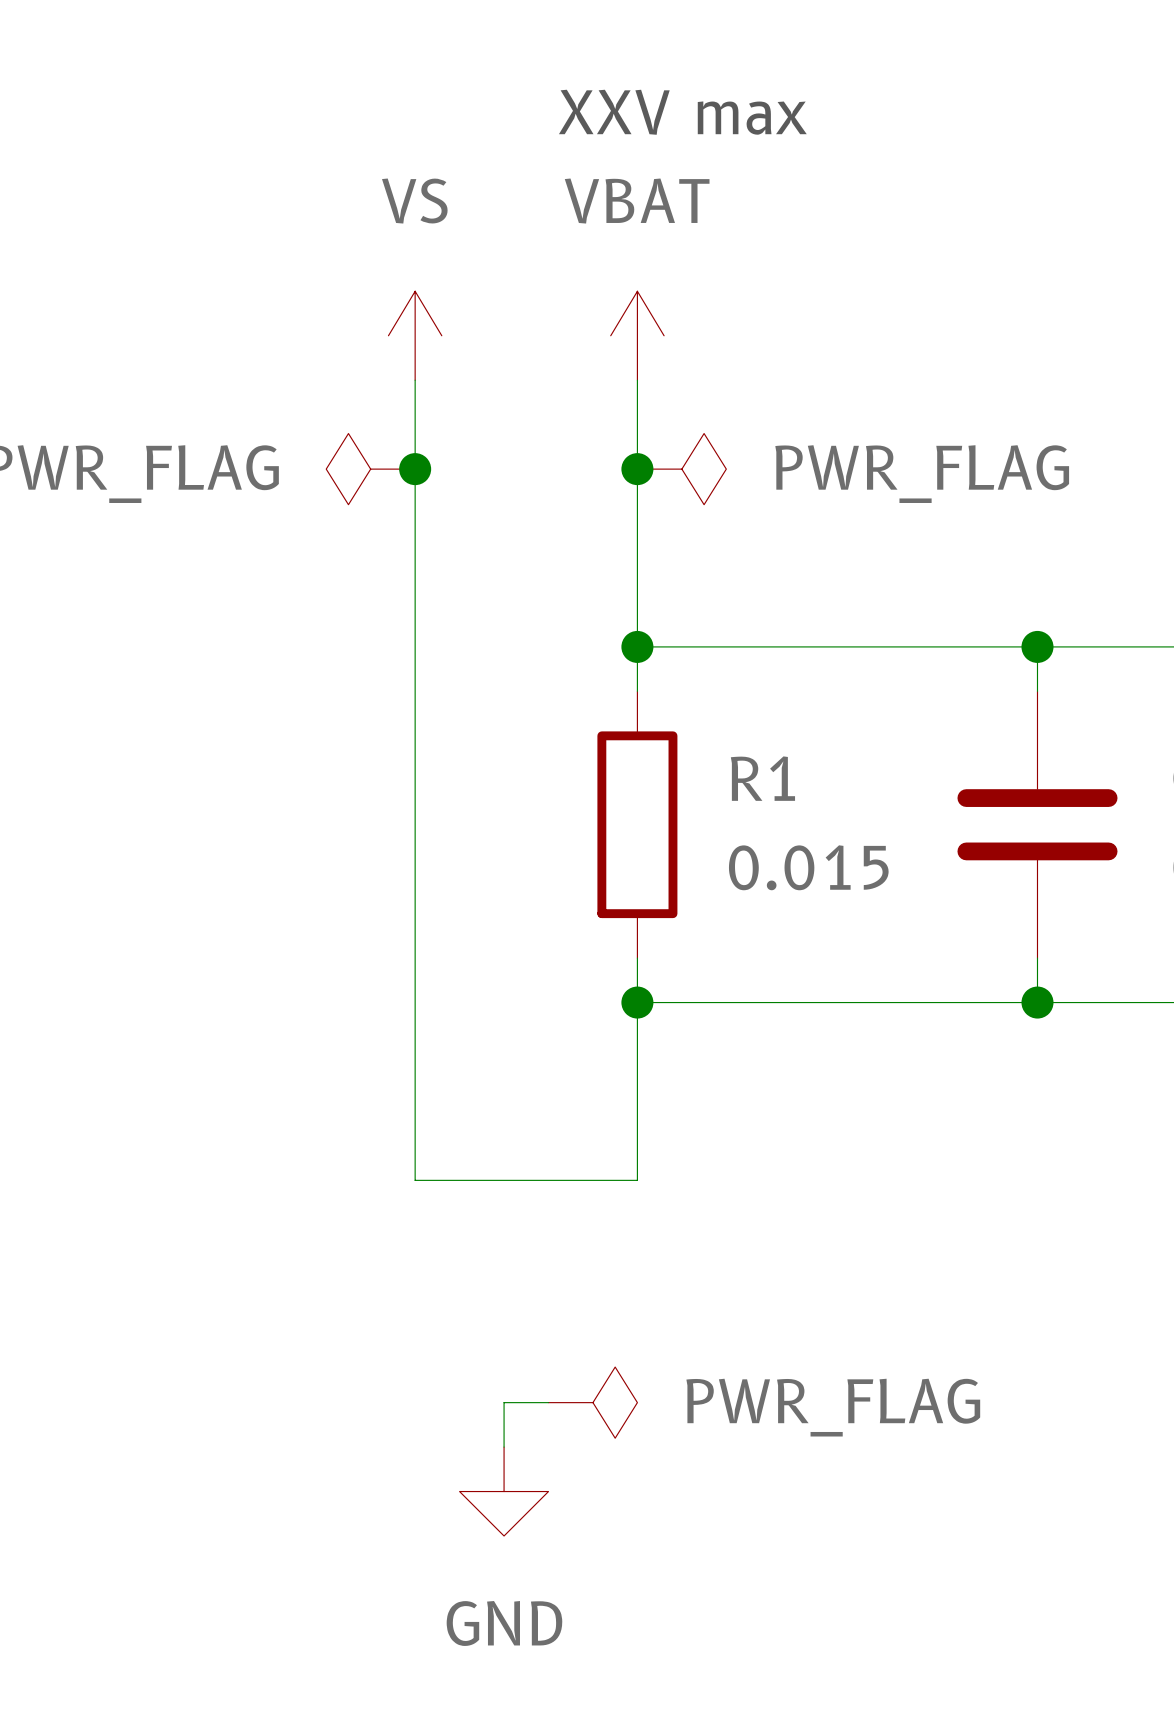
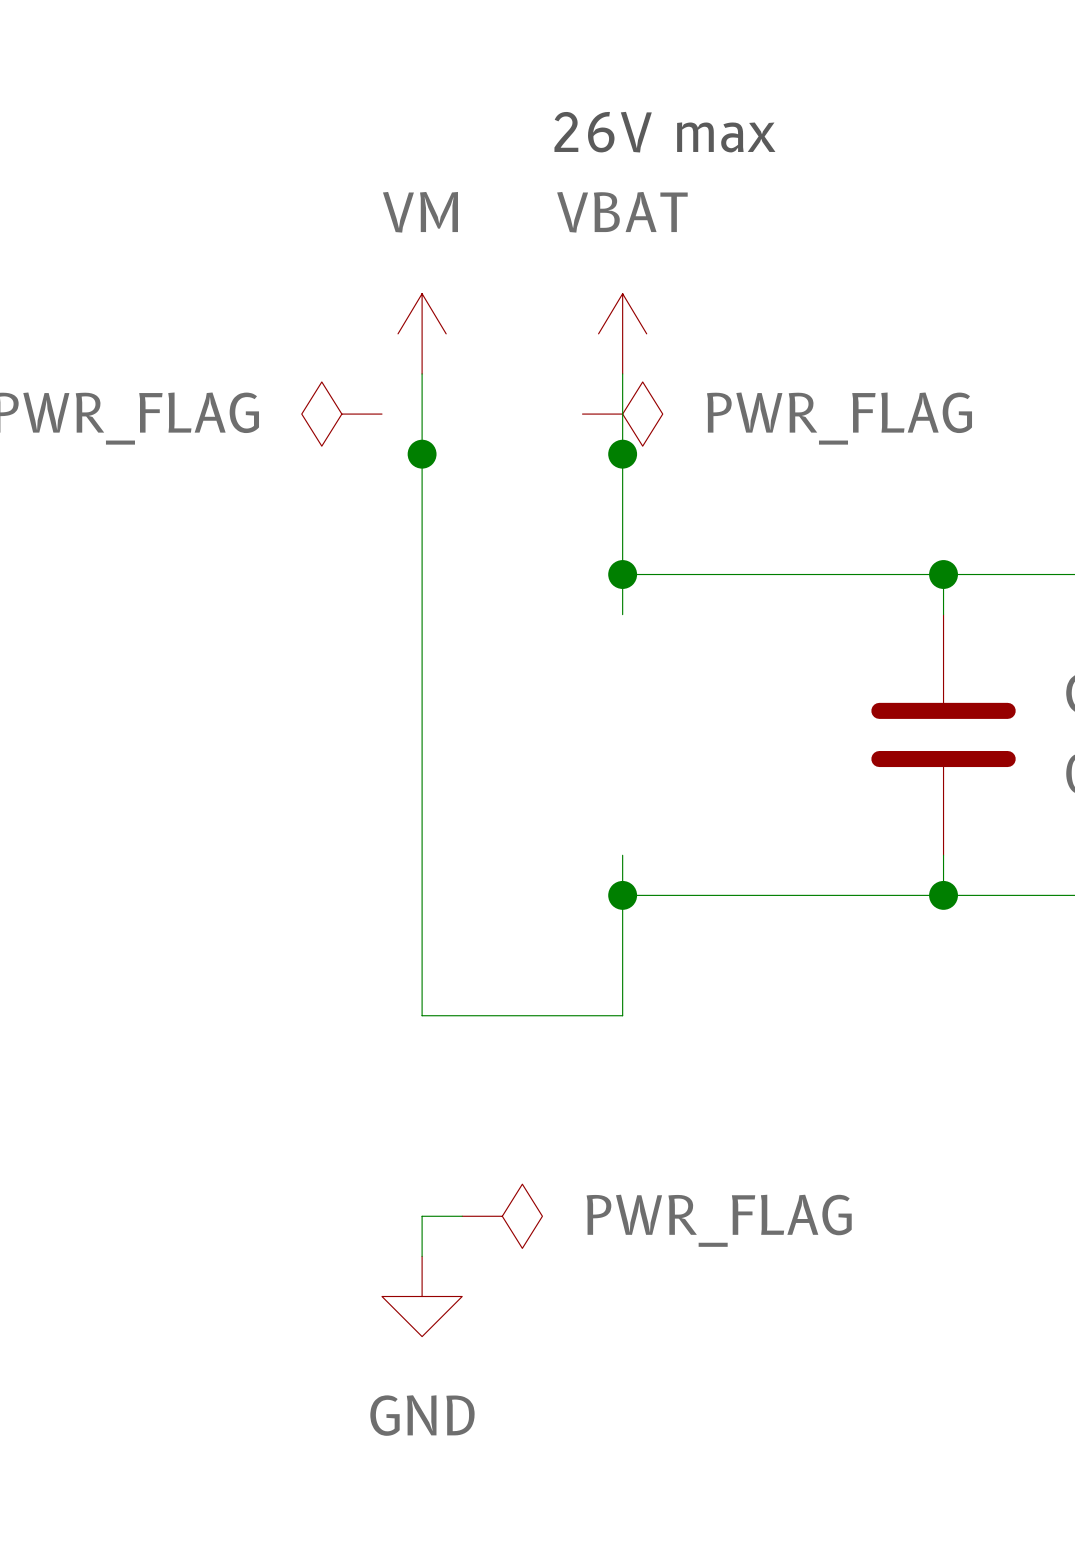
text: XXV max (682, 112) -> 26V max (664, 132)
power symbol: VS (415, 335) -> none
power symbol position: VBAT (637, 335) -> VBAT (622, 333)
wire: (415, 380) (415, 1180) (637, 1180) (637, 958) -> none
power symbol: none -> VM (422, 333)
wire: (637, 380) (637, 691) -> none
wire: none -> (422, 373) (422, 1015) (622, 1015) (622, 855)
wire: none -> (622, 373) (622, 614)
junction position: (415, 469) -> (422, 454)
junction position: (637, 469) -> (622, 454)
wire: (637, 646) (681, 646) -> none
junction position: (637, 646) -> (622, 574)
R1: 0.015 (637, 824) -> none
wire: (637, 1002) (681, 1002) -> none
junction position: (637, 1002) -> (622, 895)
wire: (548, 1402) (504, 1402) (504, 1447) -> (462, 1216) (422, 1216) (422, 1256)
power symbol position: PWR_FLAG (592, 1402) -> PWR_FLAG (502, 1216)
power symbol position: GND (504, 1491) -> GND (422, 1296)

